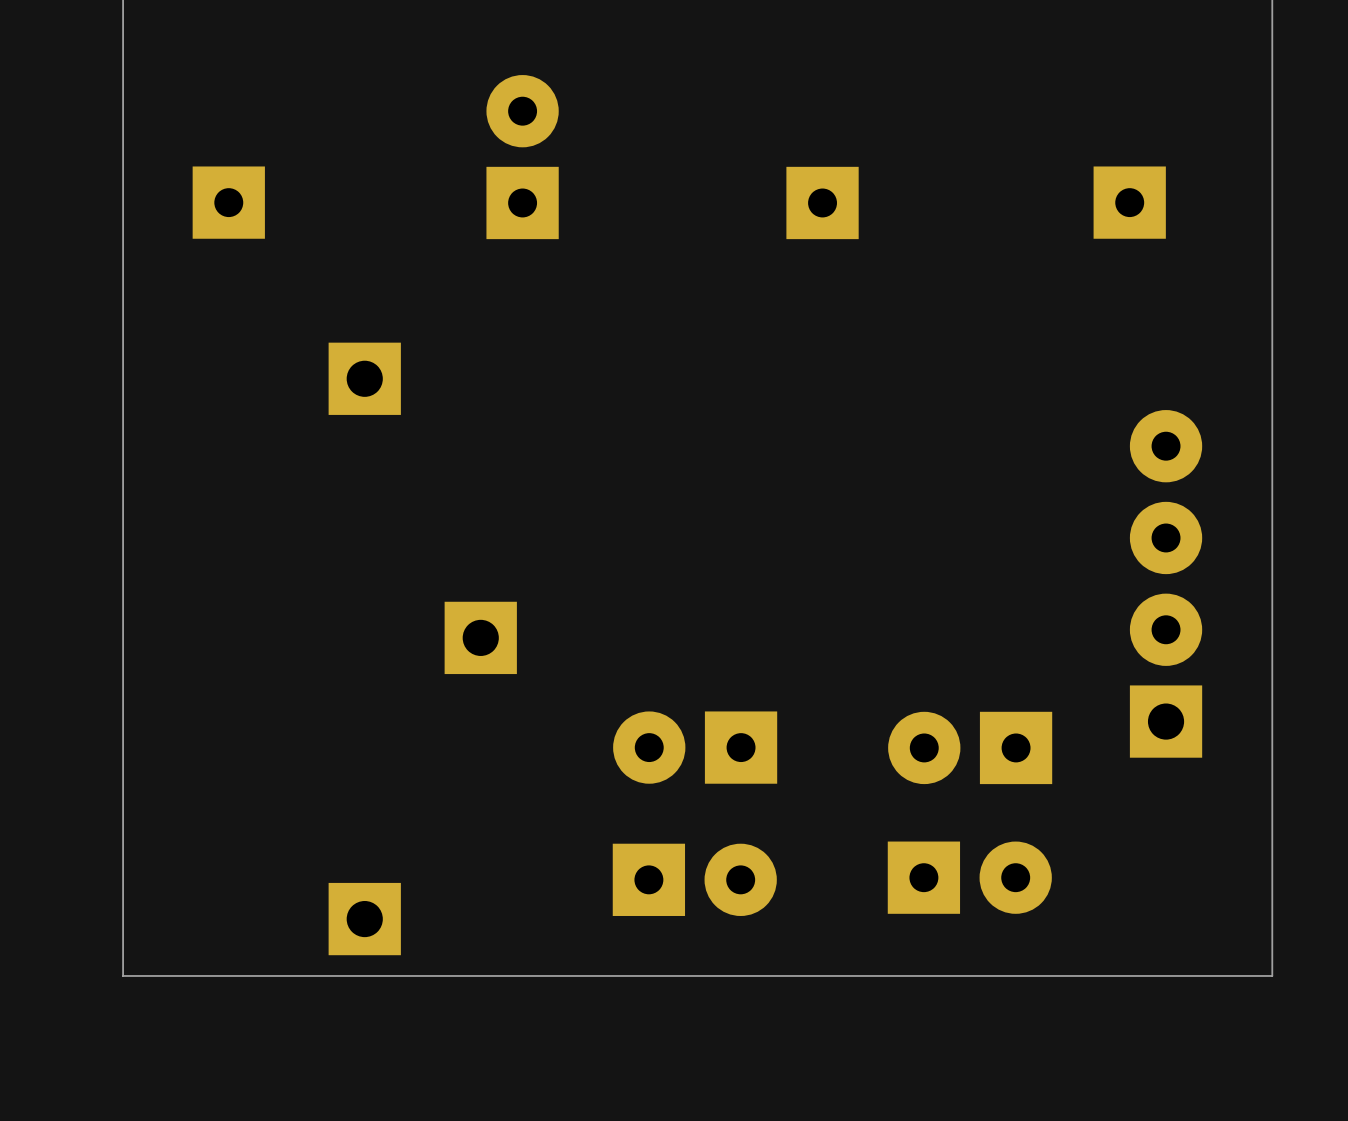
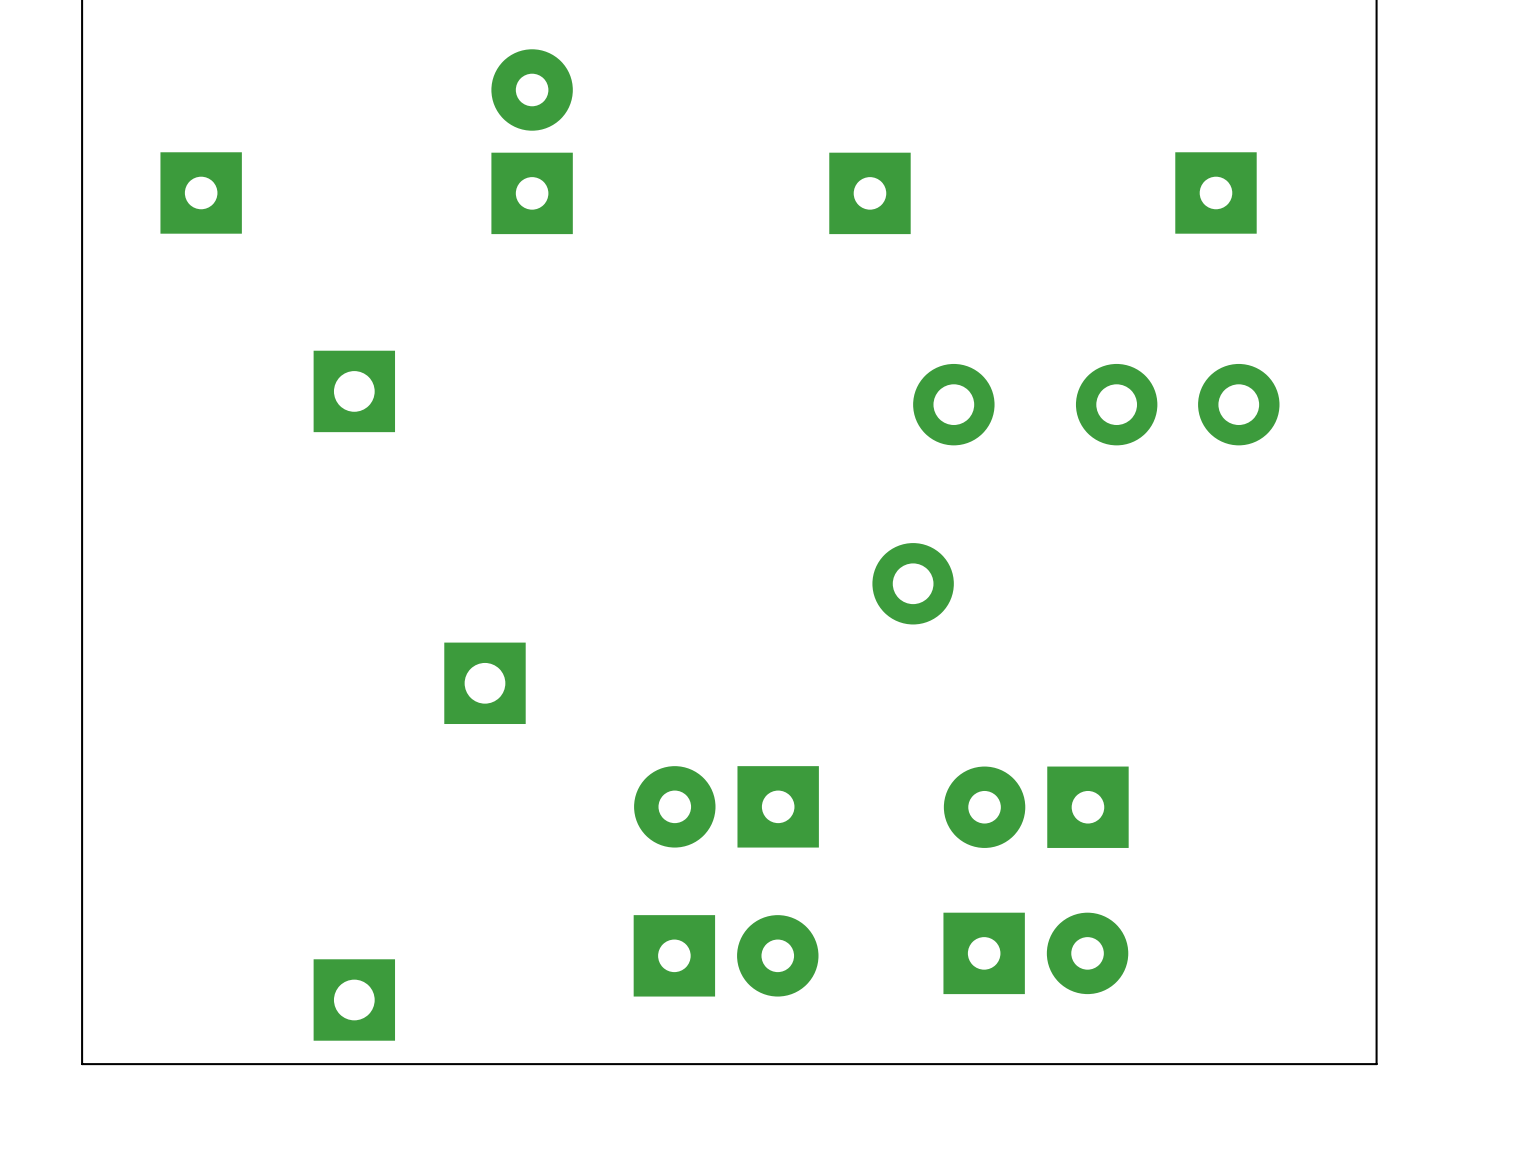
part: none -> (1075, 494)
part: (1166, 583) -> none

